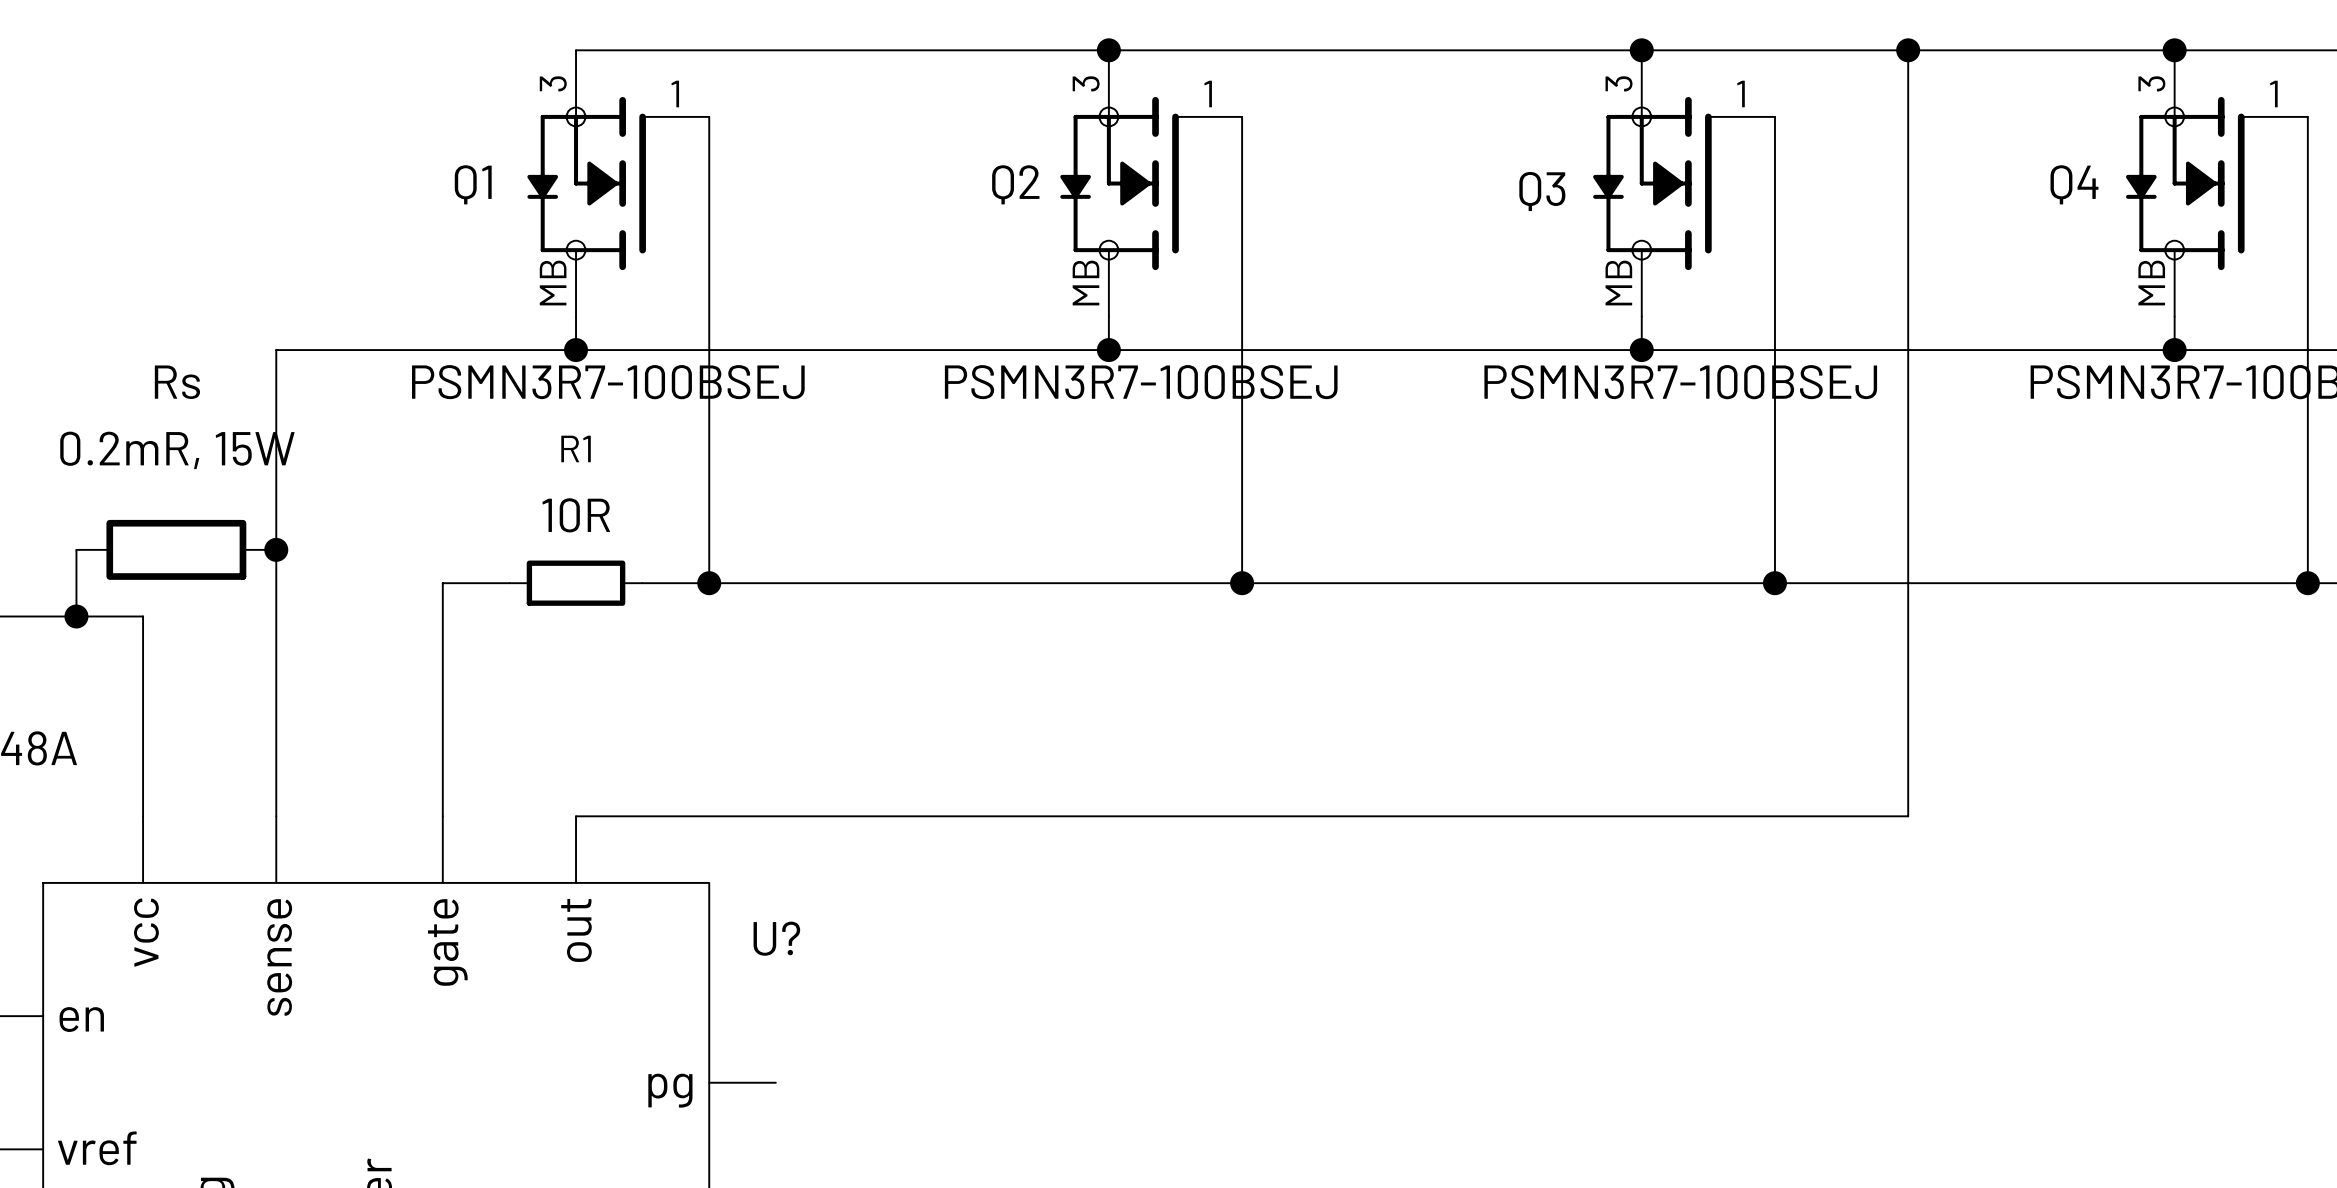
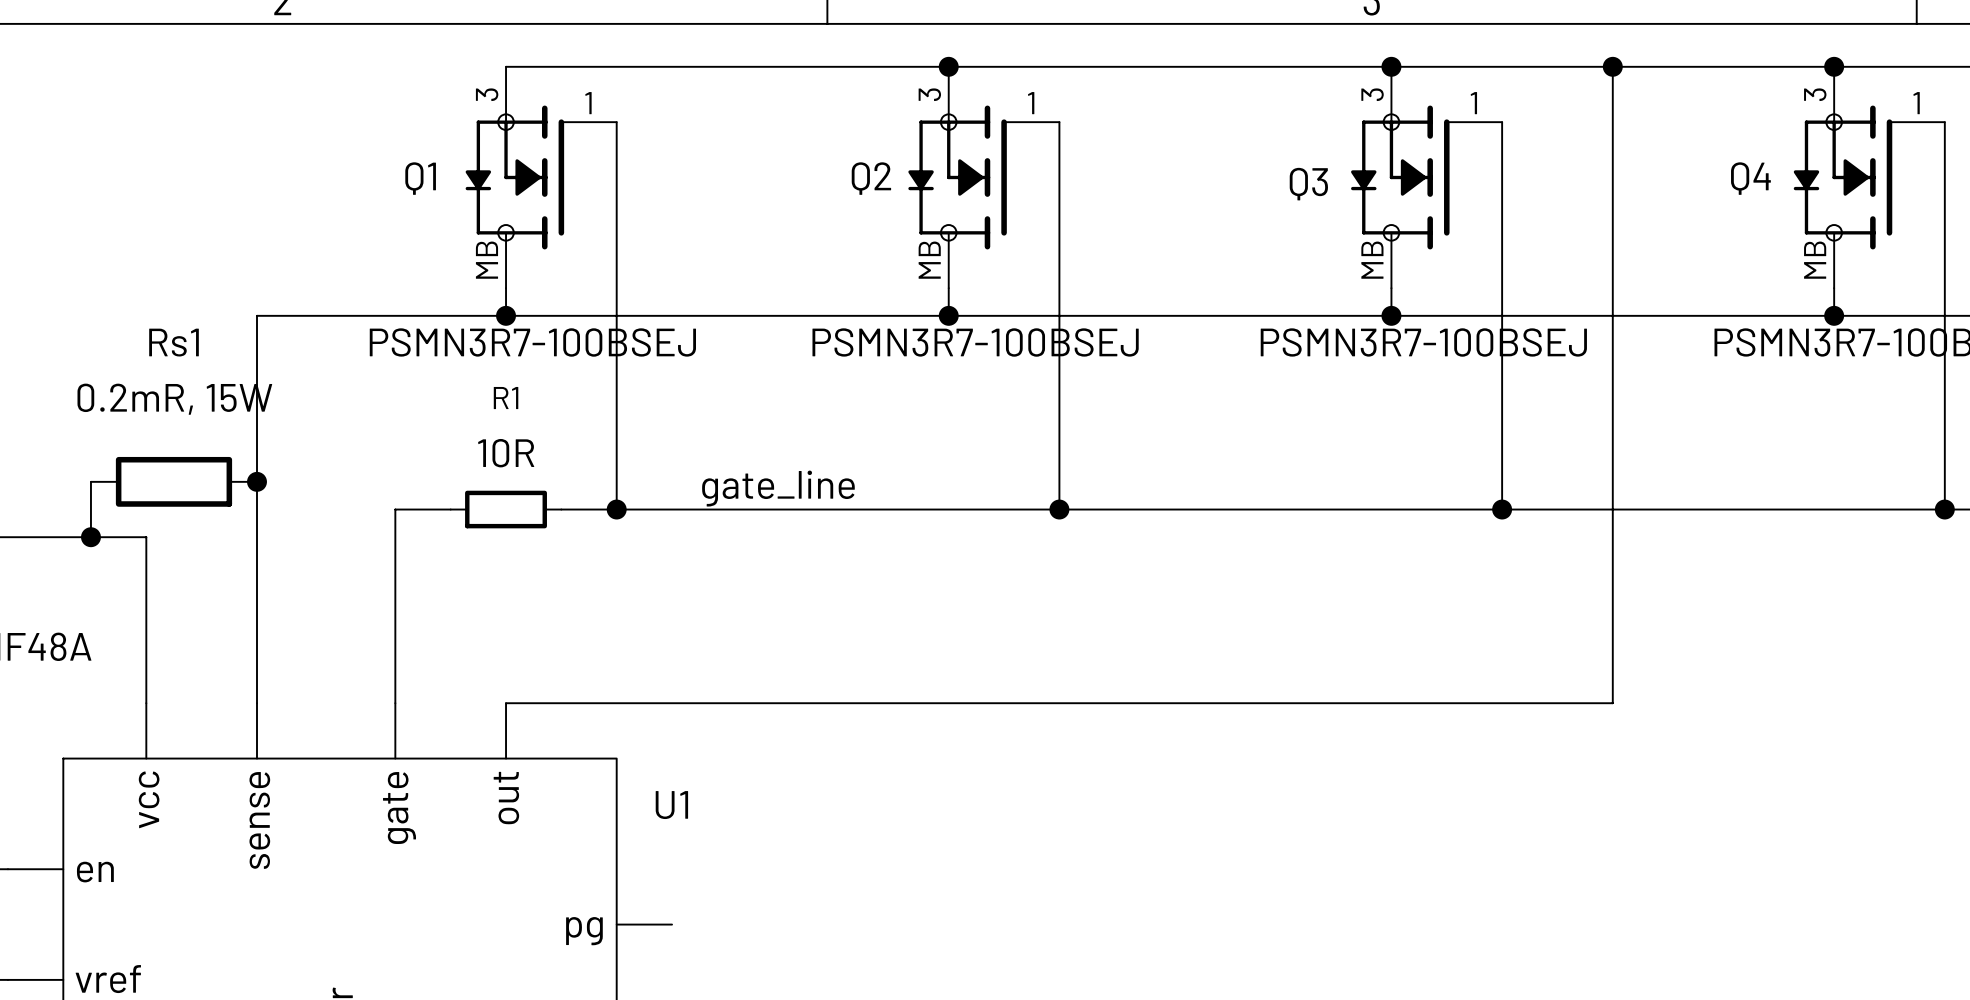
Rs name: Rs (177, 382) -> Rs1 (174, 342)
label: none -> gate_line (778, 488)
U? name: U? (776, 938) -> U1 (671, 805)

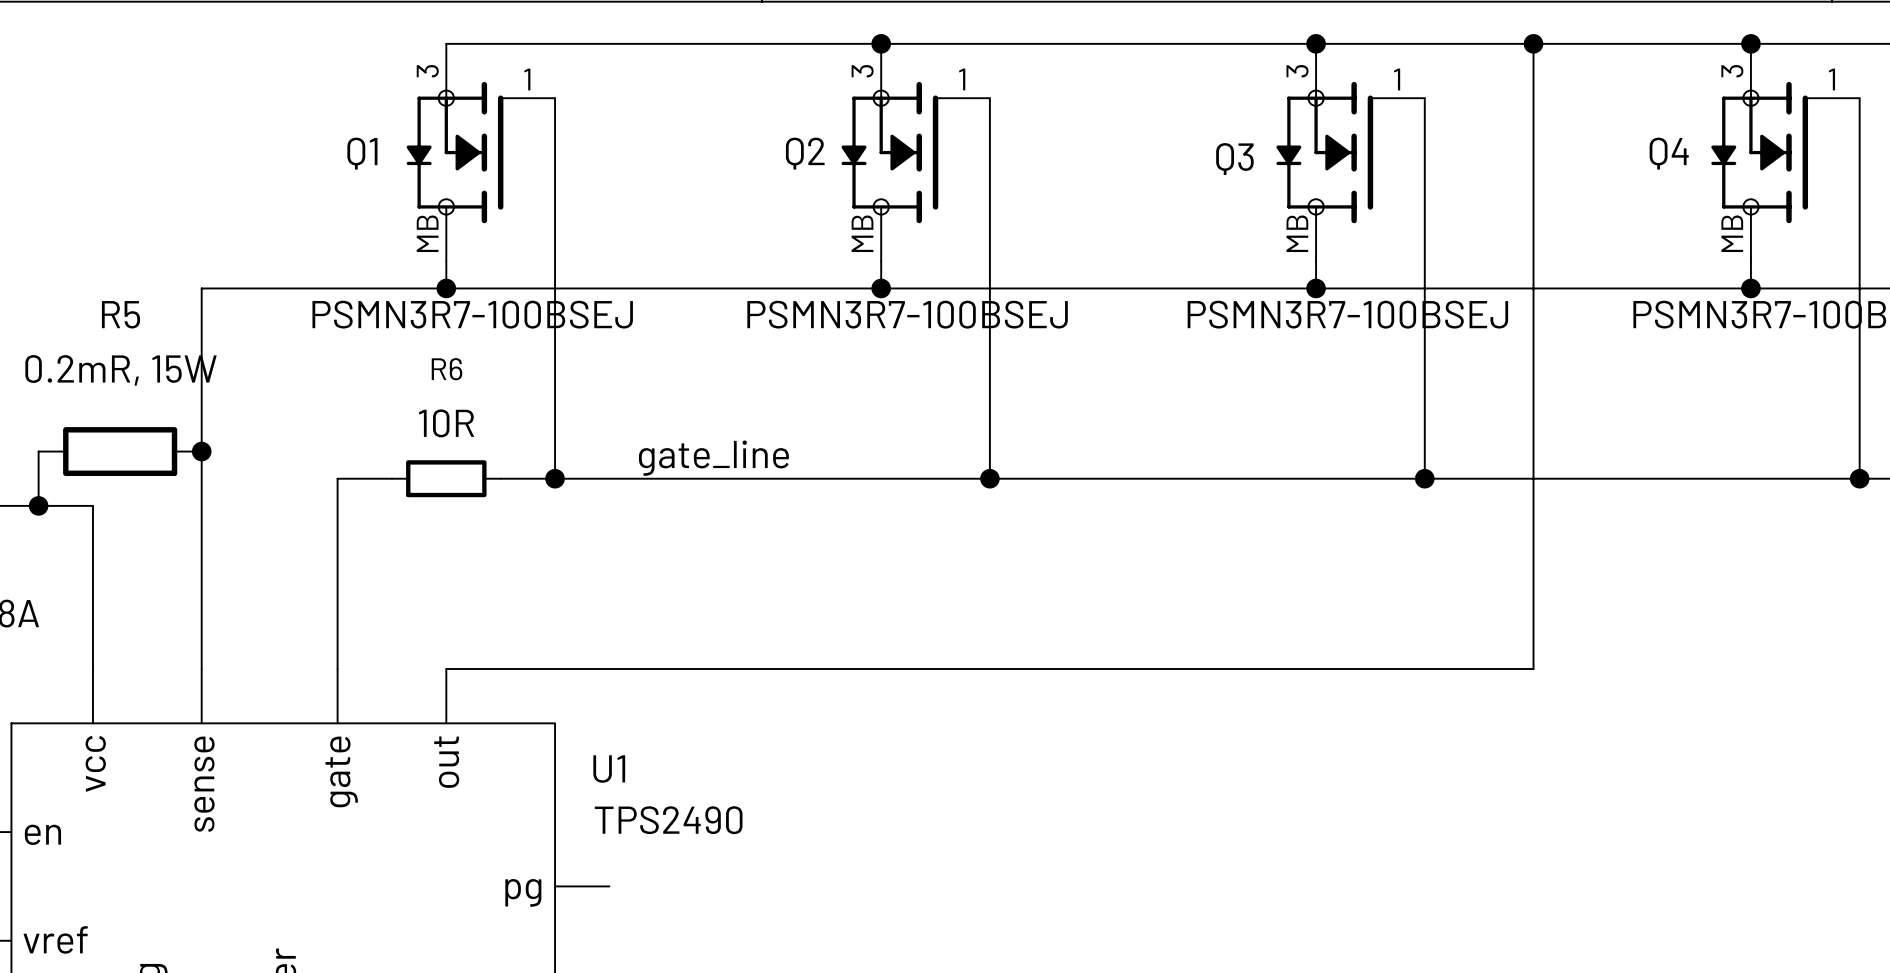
Rs1 name: Rs1 (174, 342) -> R5 (121, 314)
R1 name: R1 (506, 398) -> R6 (447, 369)
U1 value: none -> TPS2490 (668, 820)

